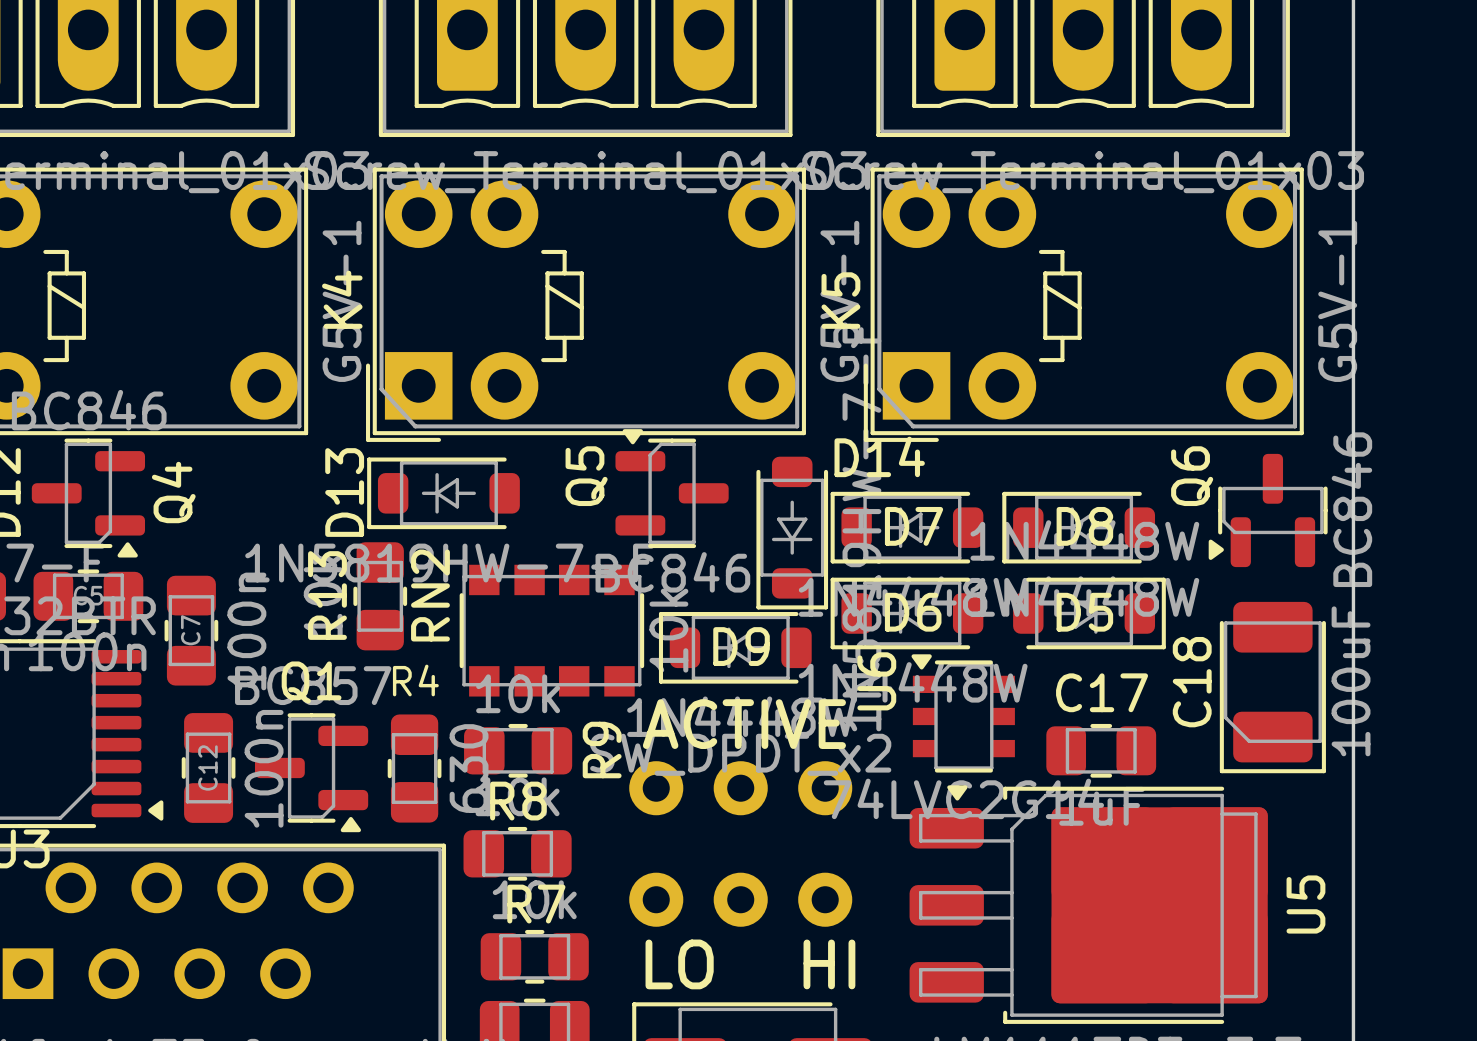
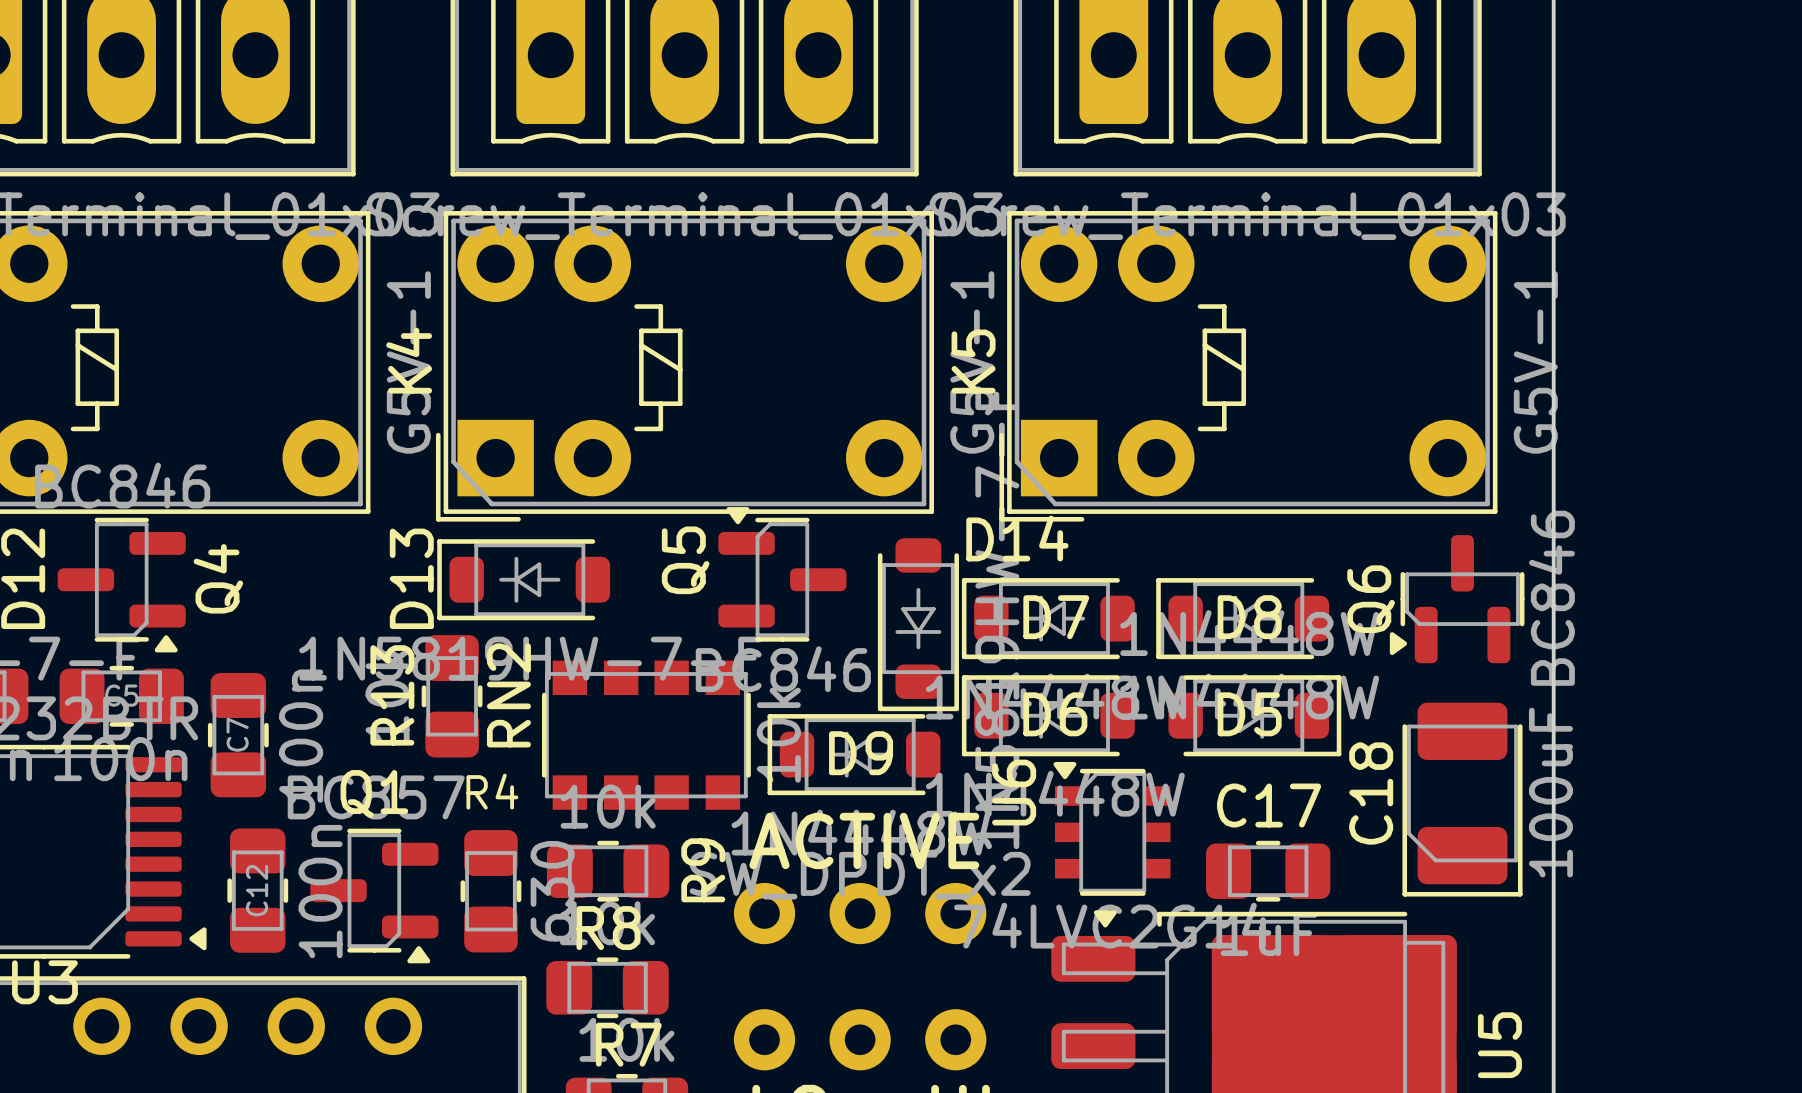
Q6 name position: Q6 (1192, 476) -> Q6 (1371, 599)

